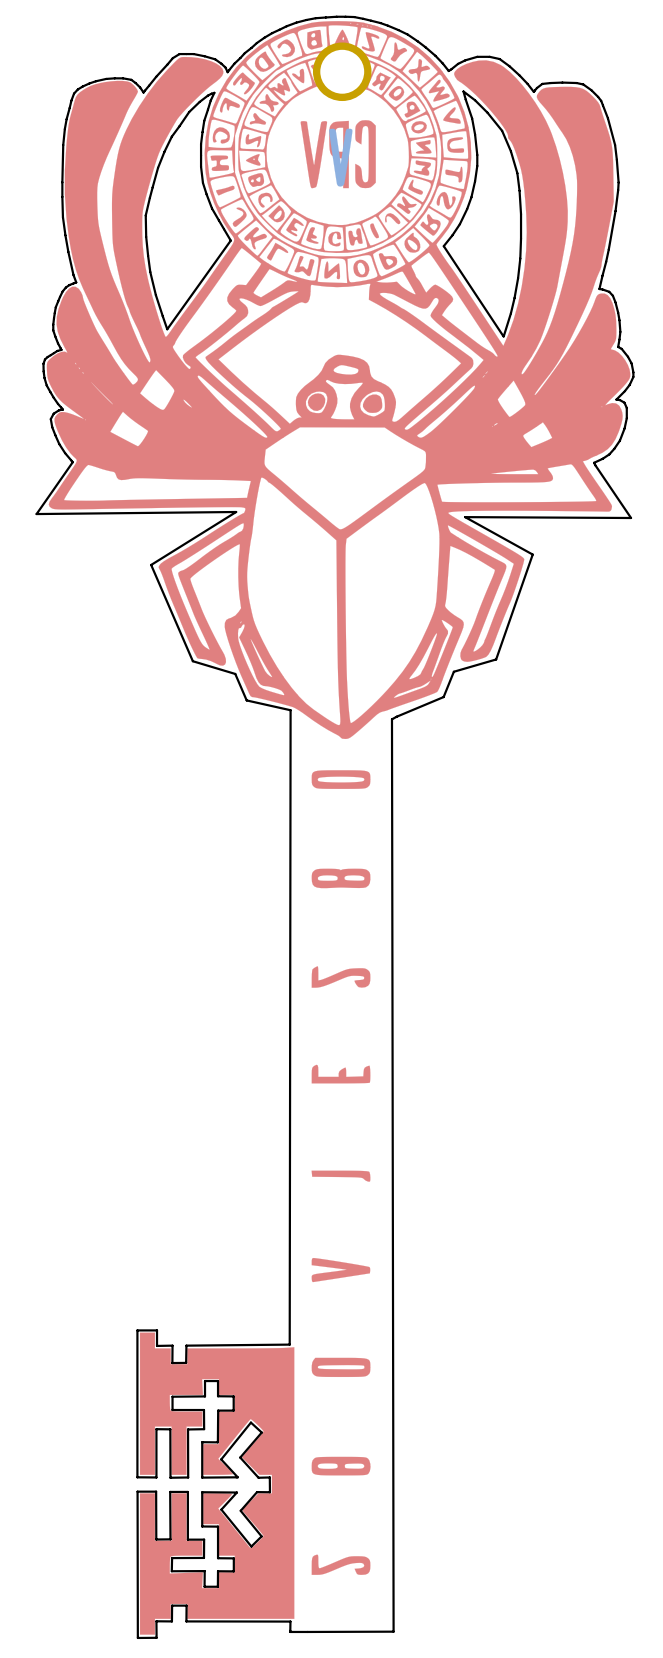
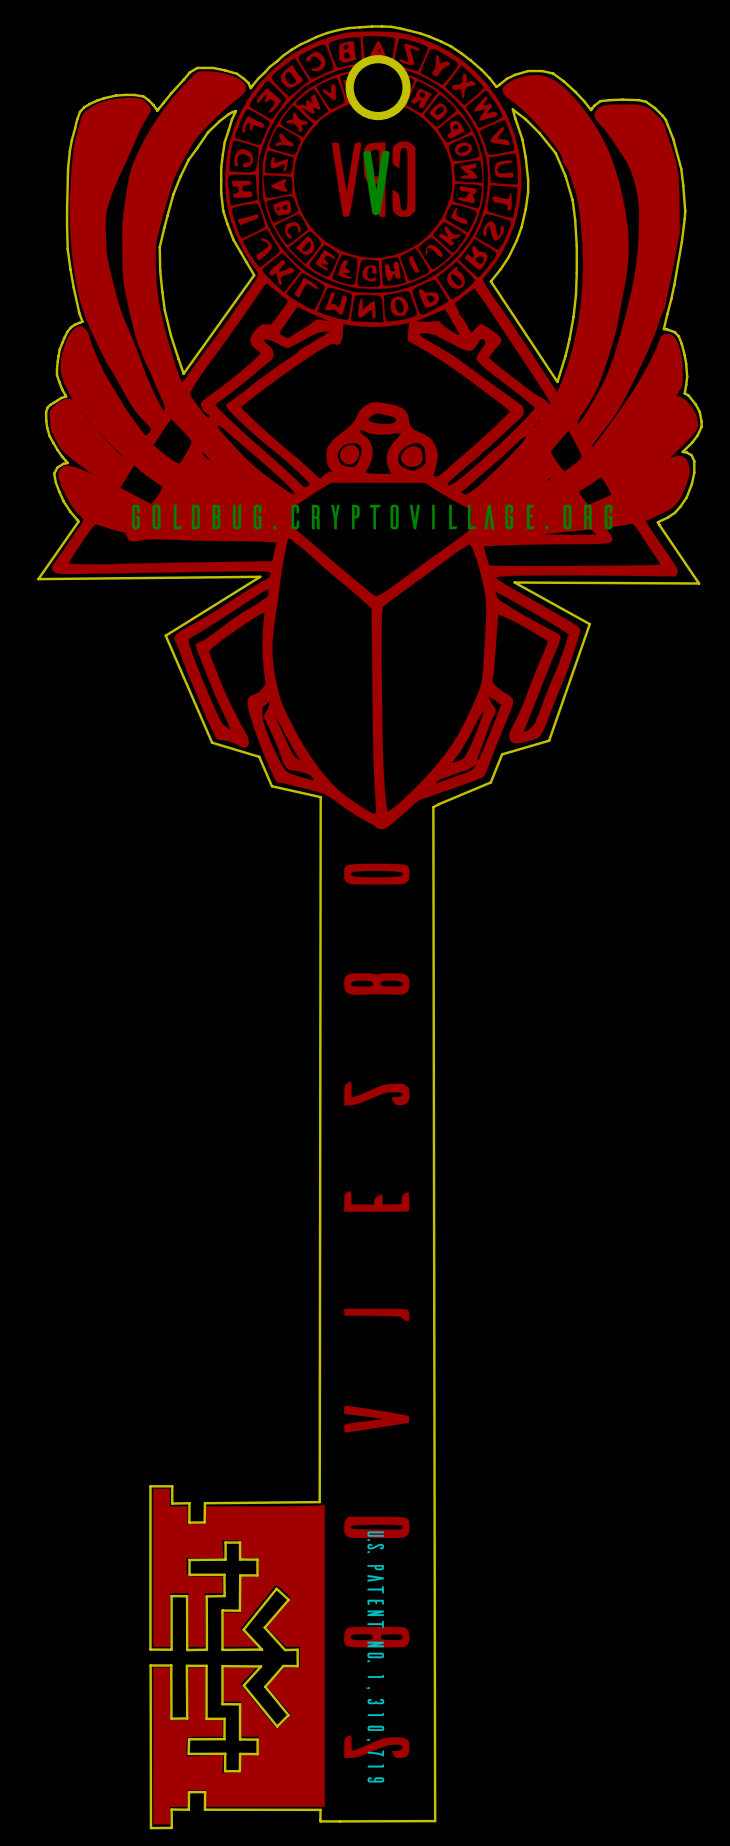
drawing: none -> [132, 504, 613, 530]
drawing: none -> [366, 1531, 385, 1783]

